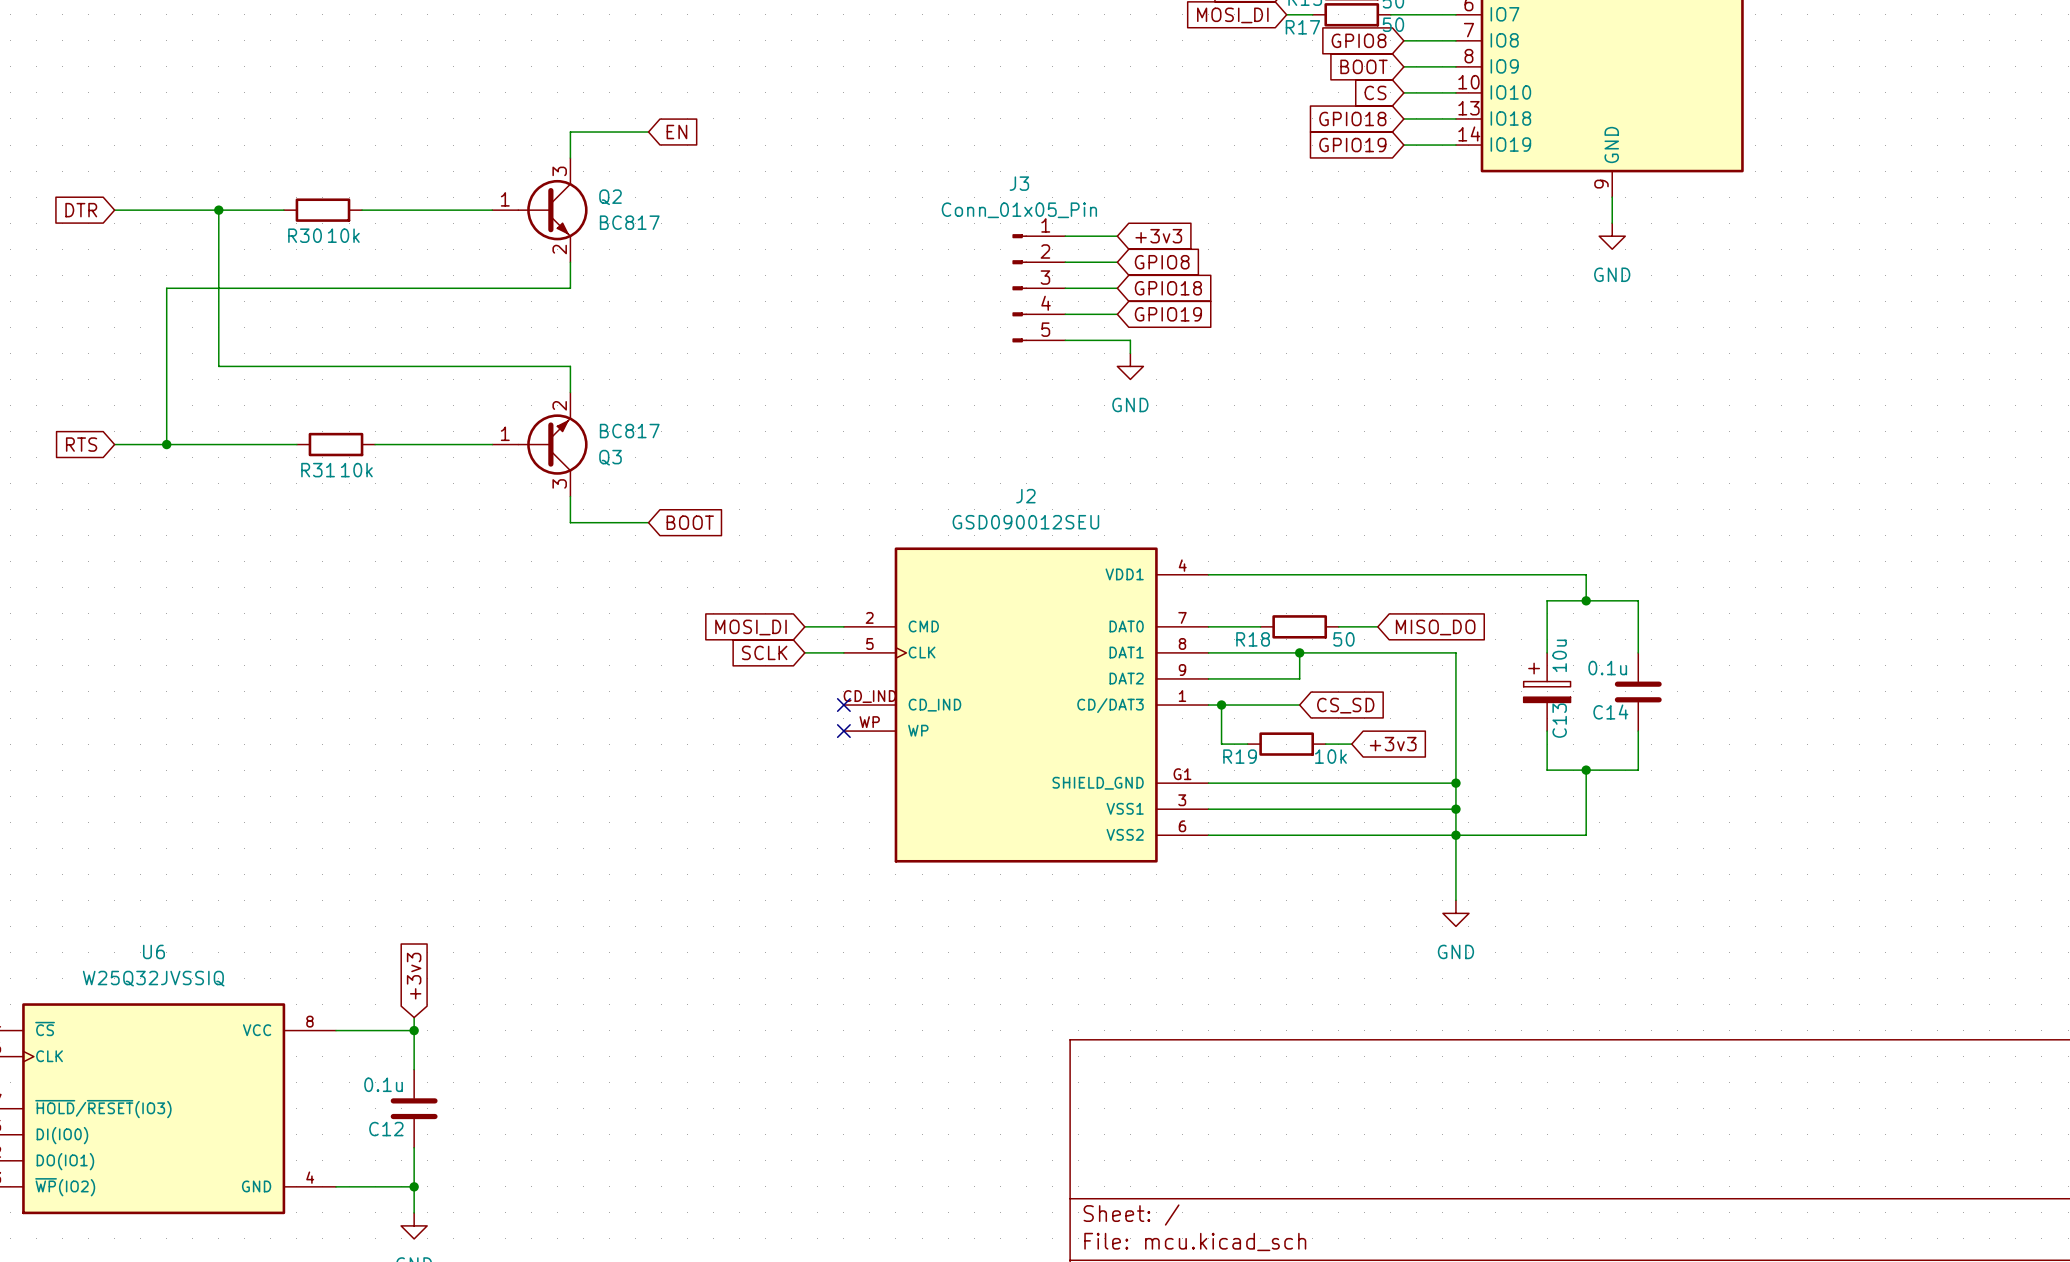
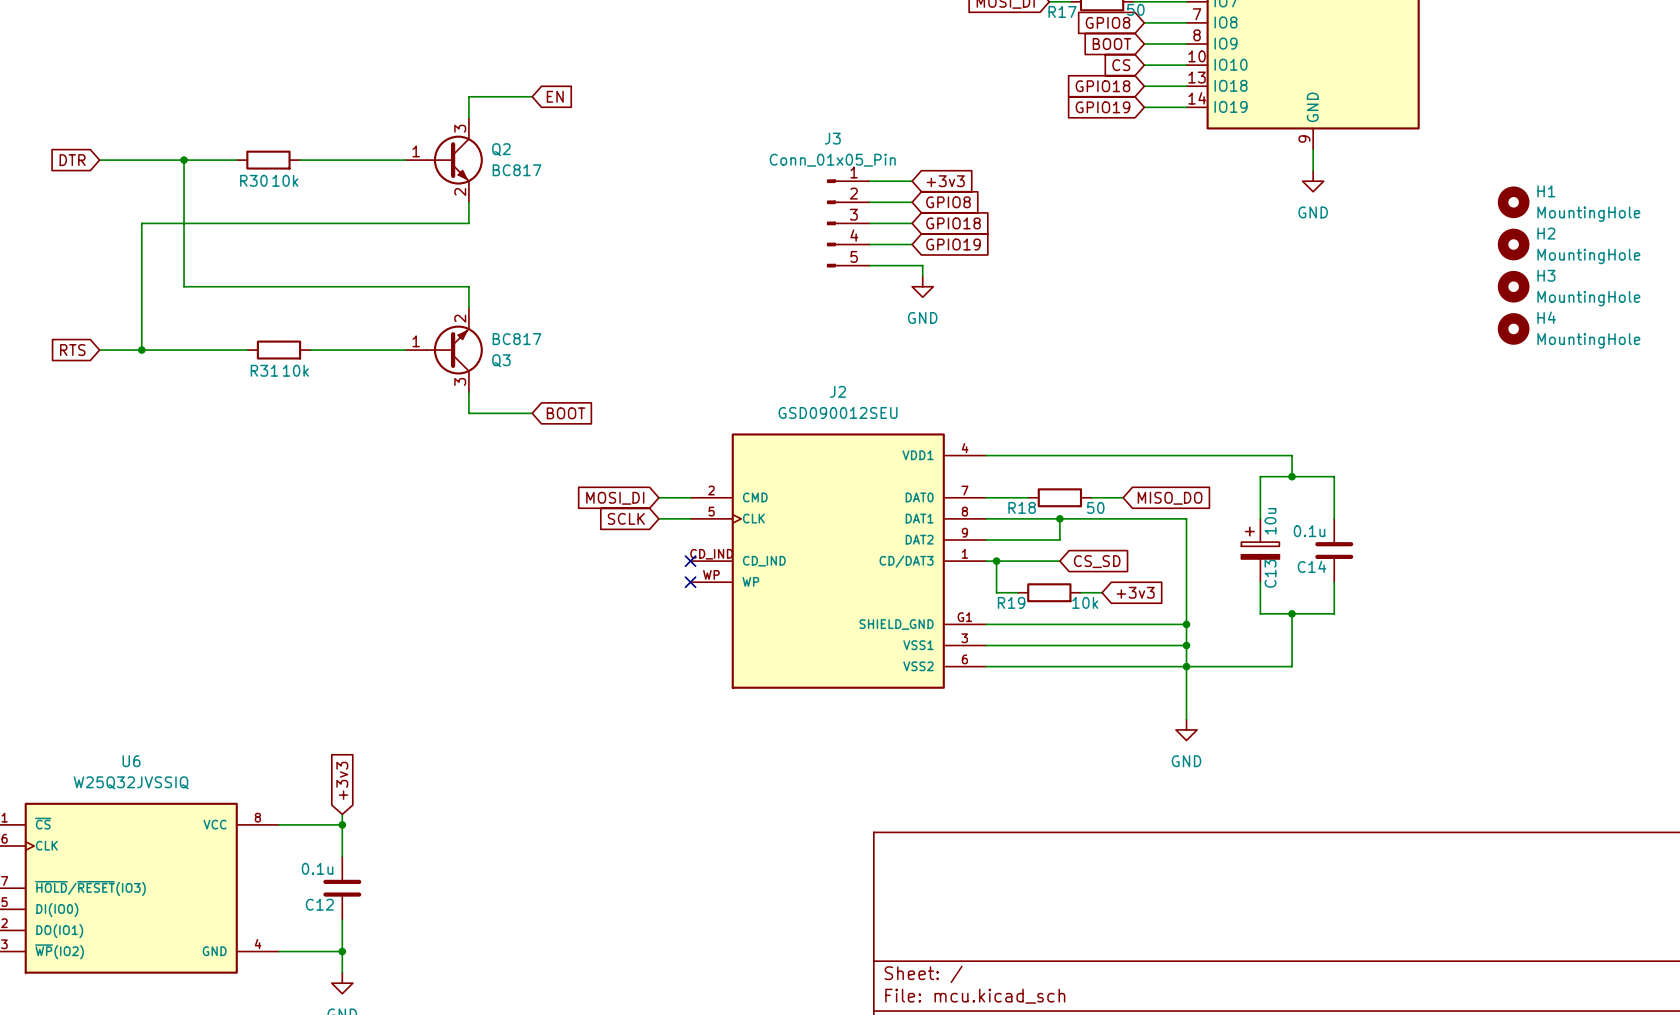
H1: none -> MountingHole (1513, 202)
H2: none -> MountingHole (1513, 244)
H3: none -> MountingHole (1513, 286)
H4: none -> MountingHole (1513, 328)

